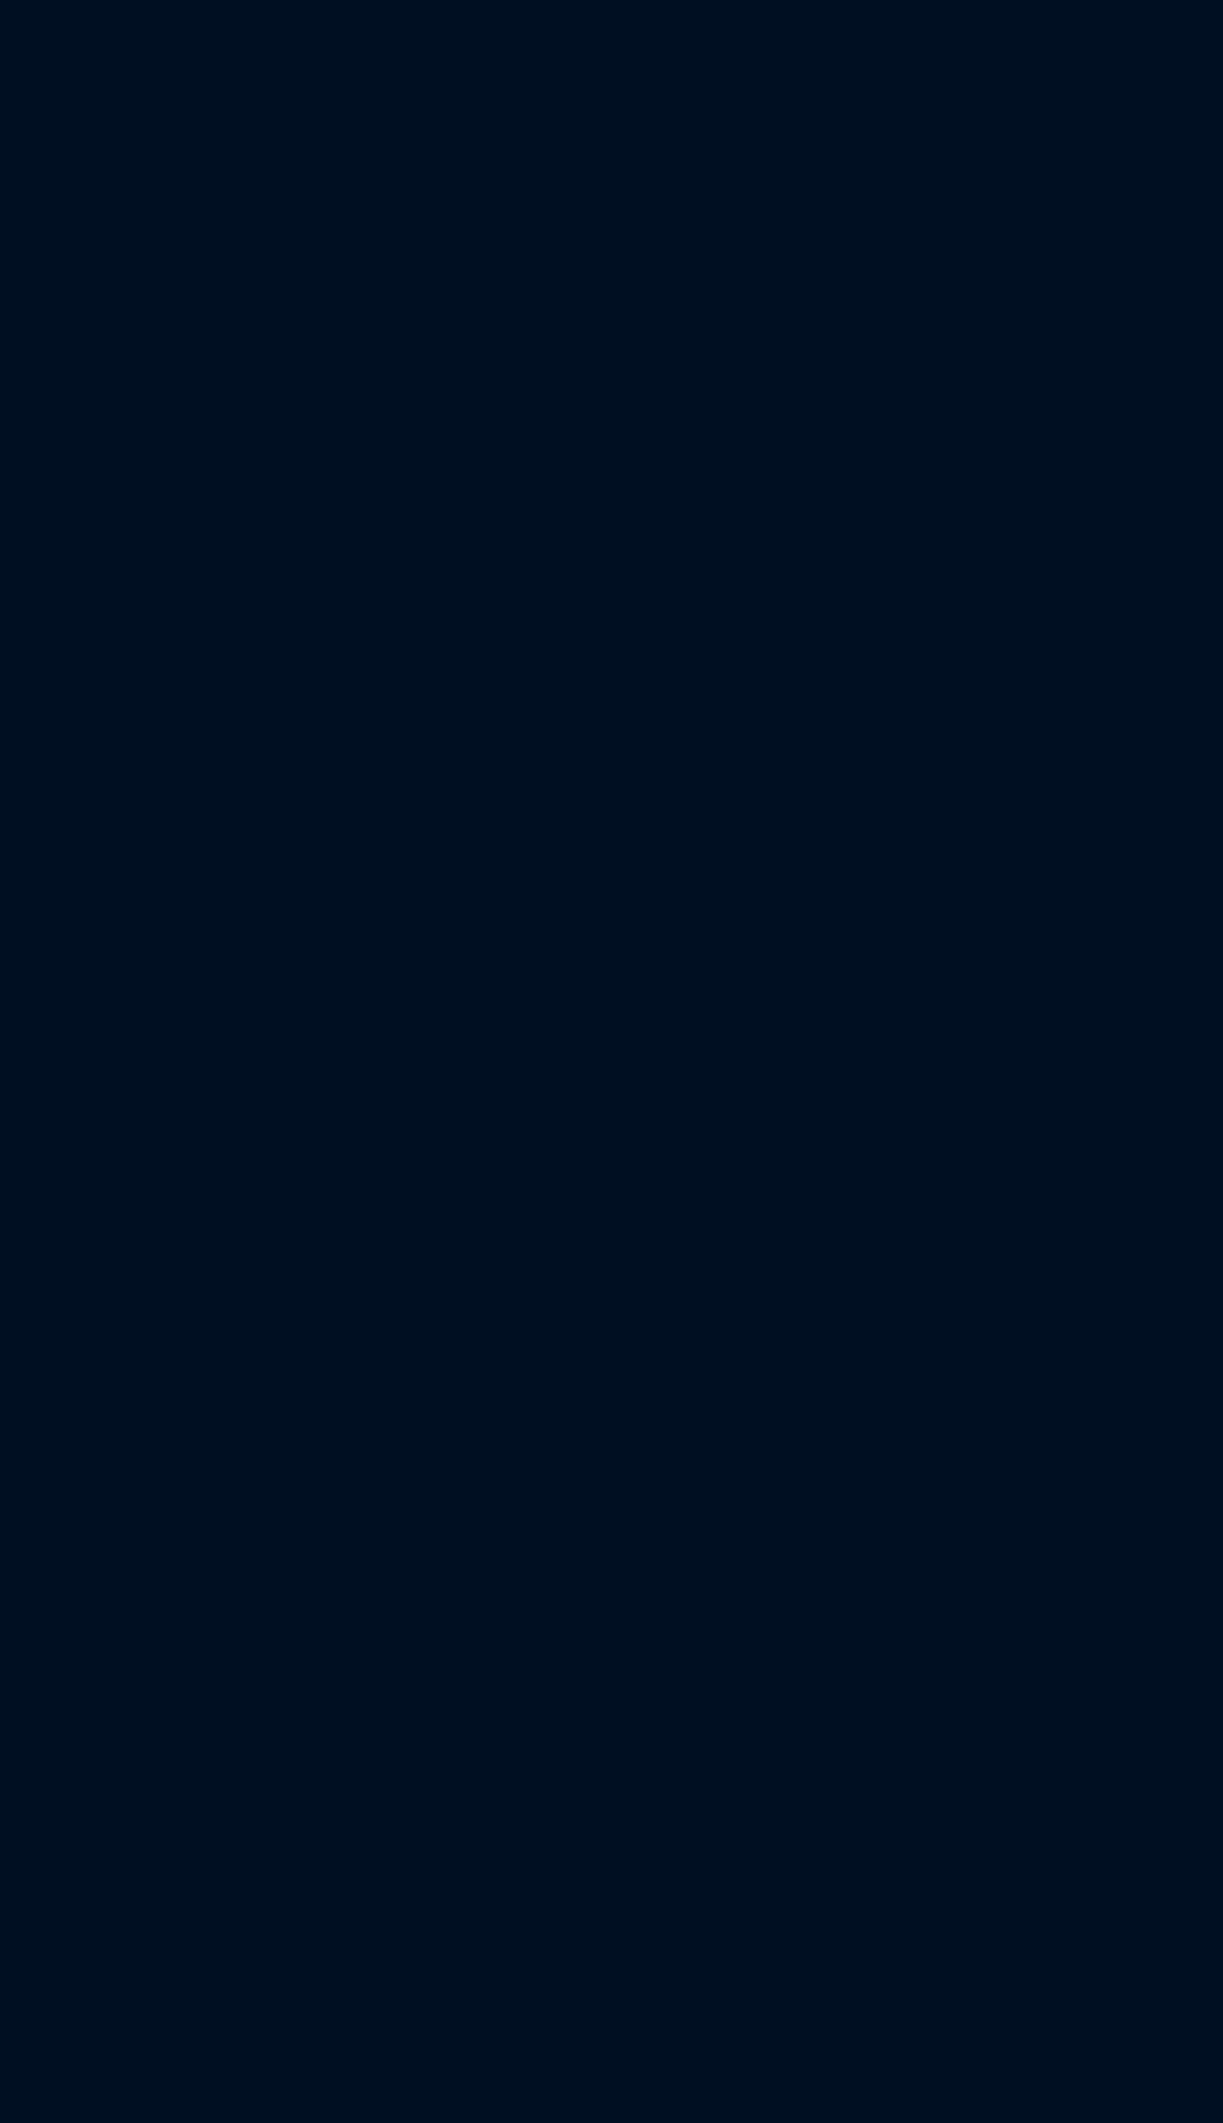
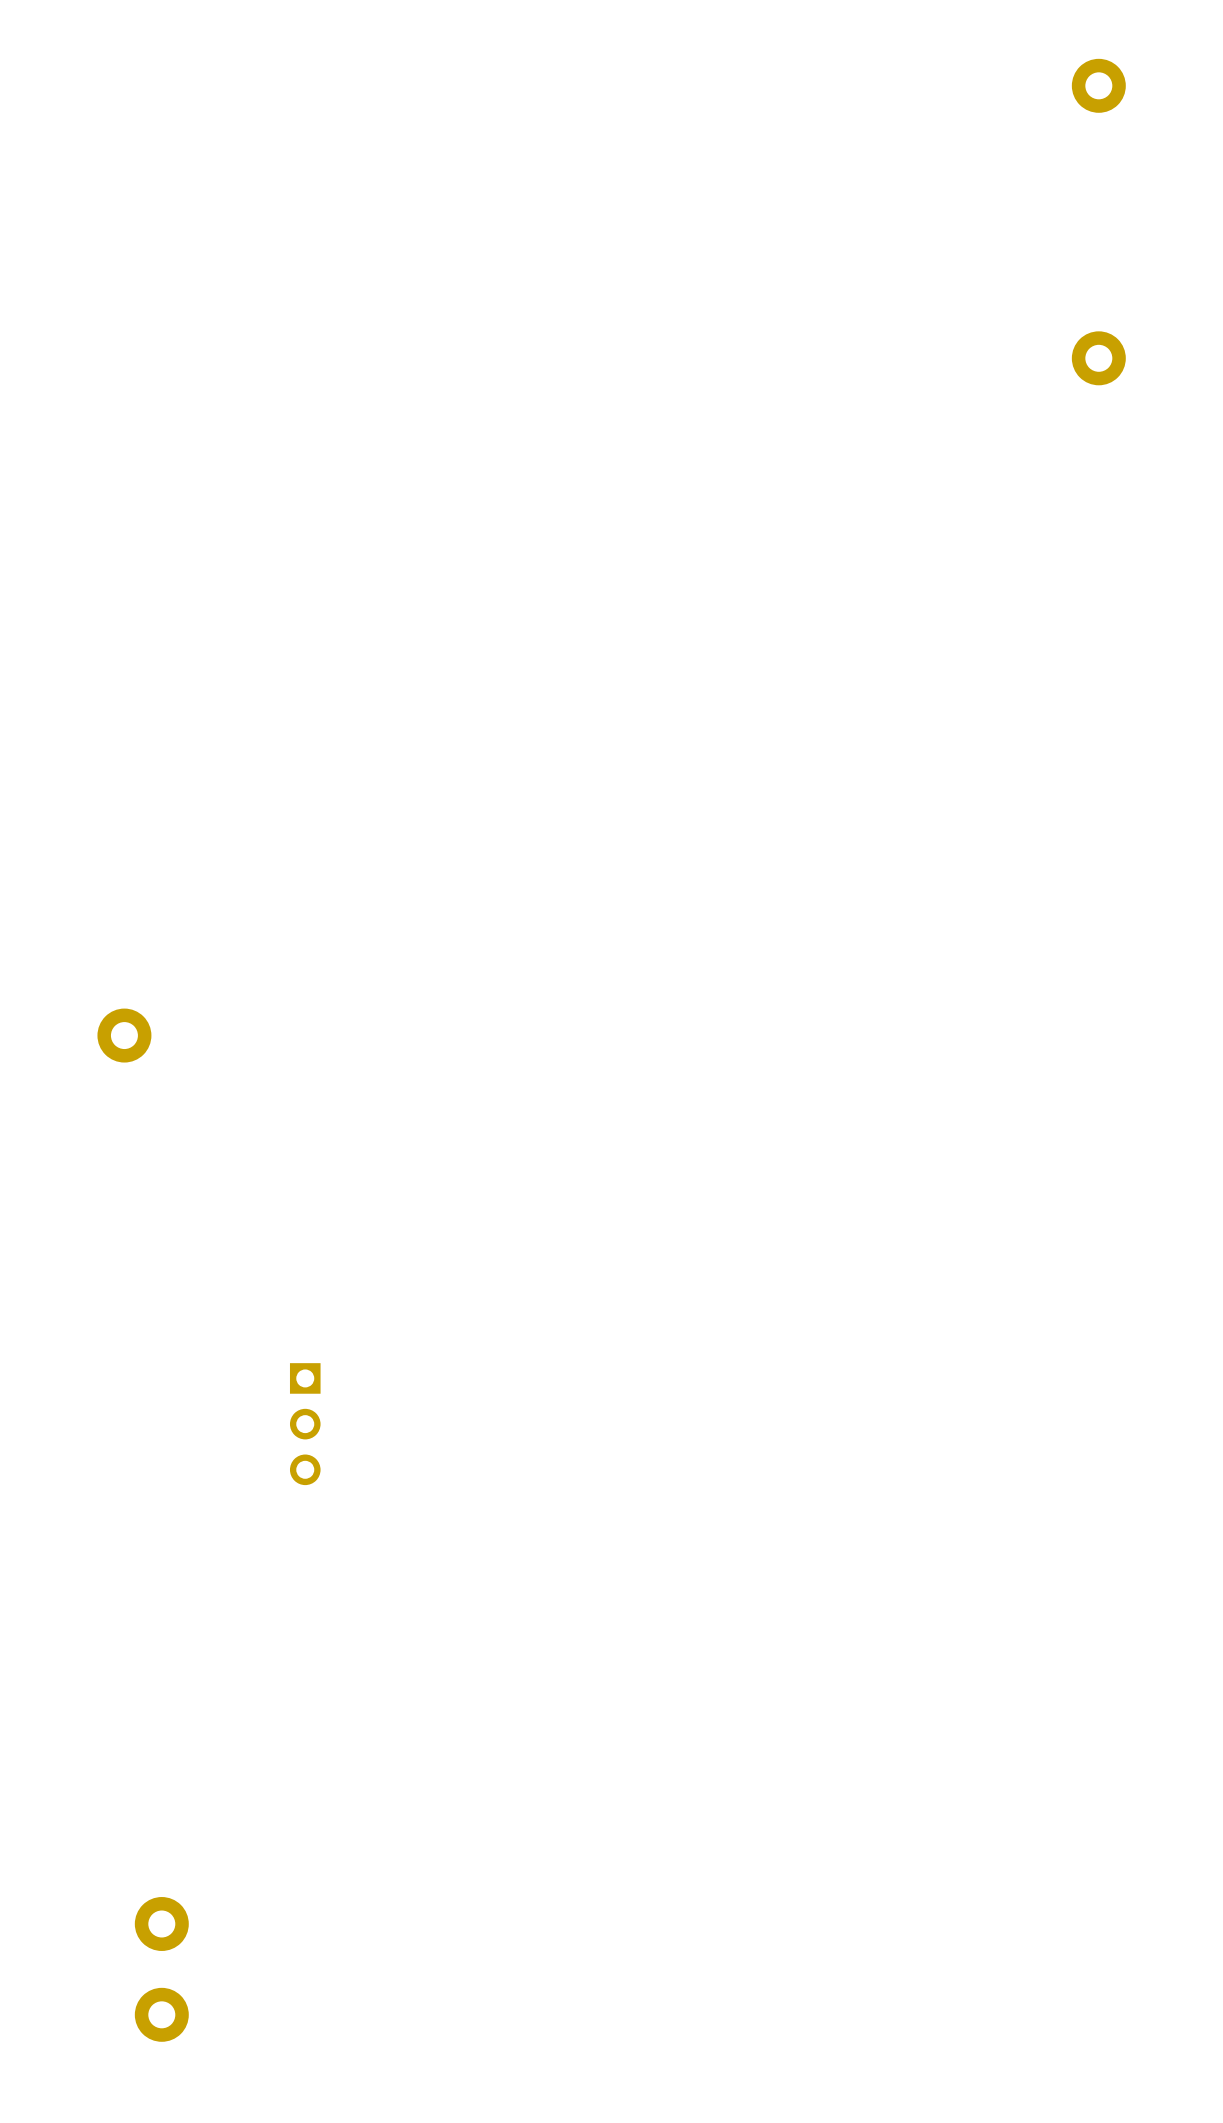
part: none -> (1098, 85)
part: none -> (1098, 358)
part: none -> (124, 1035)
part: none -> (305, 1424)
part: none -> (161, 1923)
part: none -> (161, 2014)

